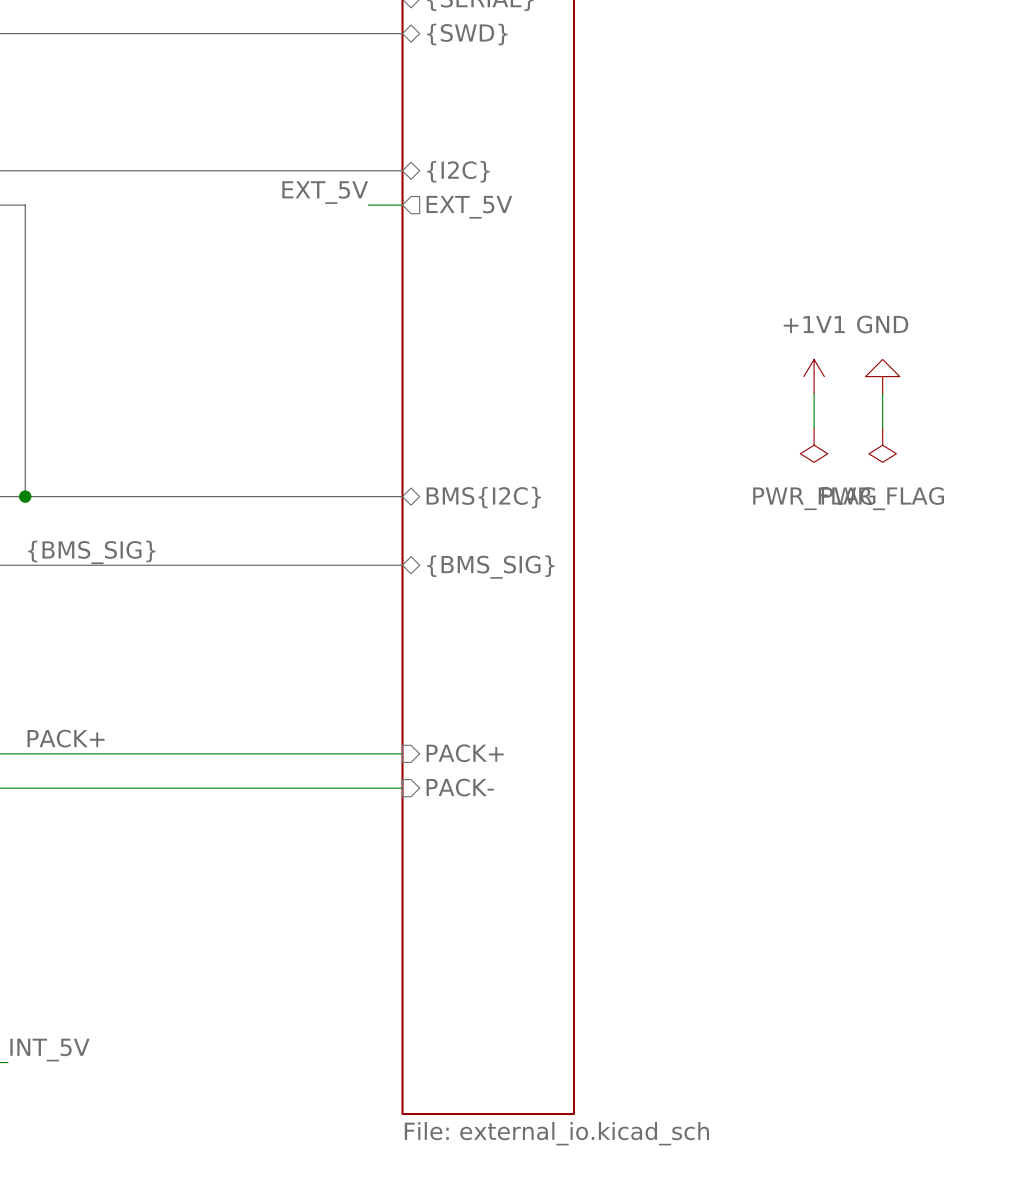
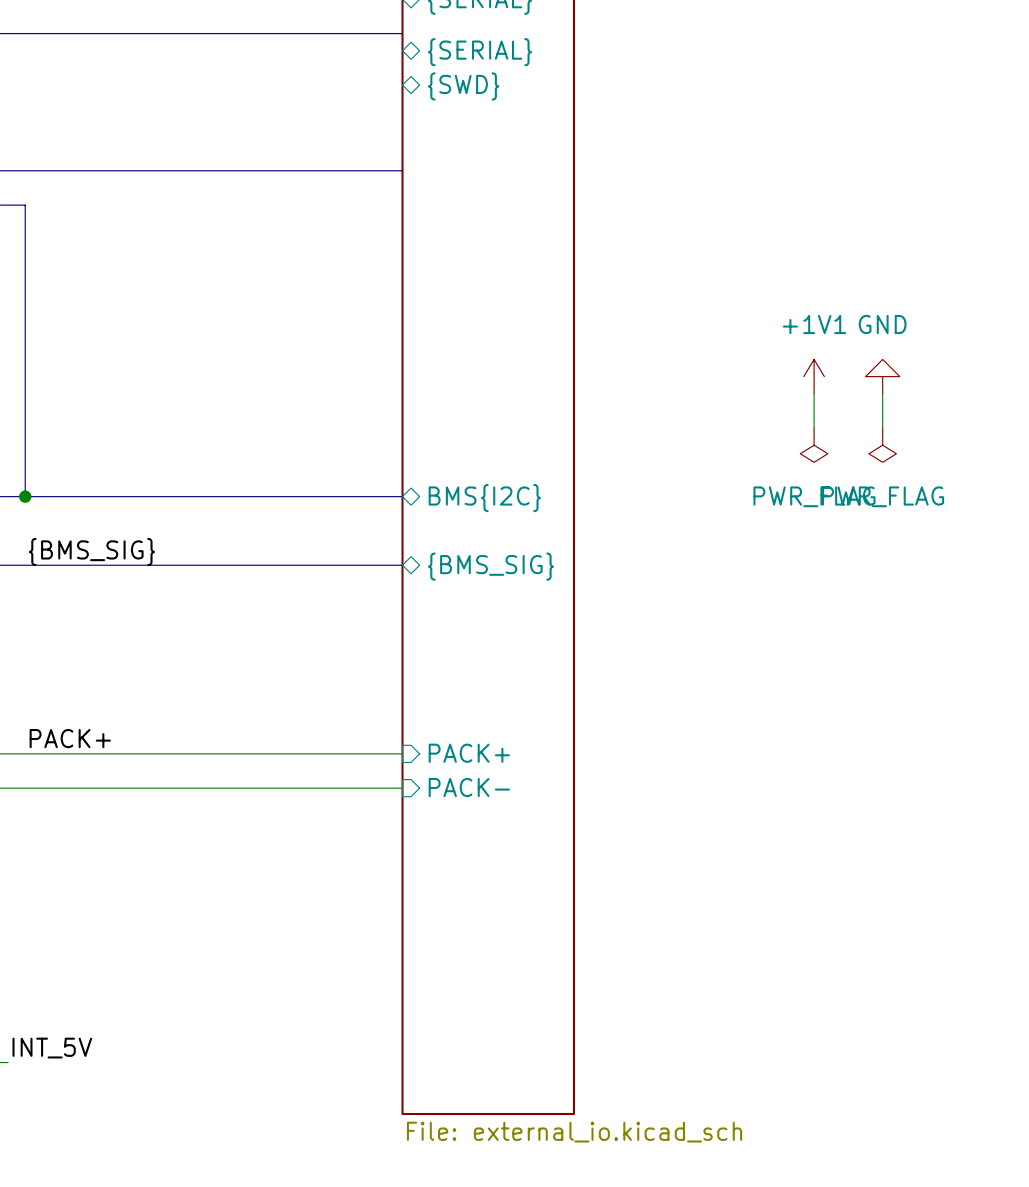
sheet pin position: {SWD} (467, 34) -> {SWD} (463, 86)
sheet pin: none -> {SERIAL} (479, 52)
sheet pin: {I2C} (458, 171) -> none
label: EXT_5V (325, 192) -> none
wire: (368, 205) (402, 205) -> none
sheet pin: EXT_5V (469, 207) -> none

